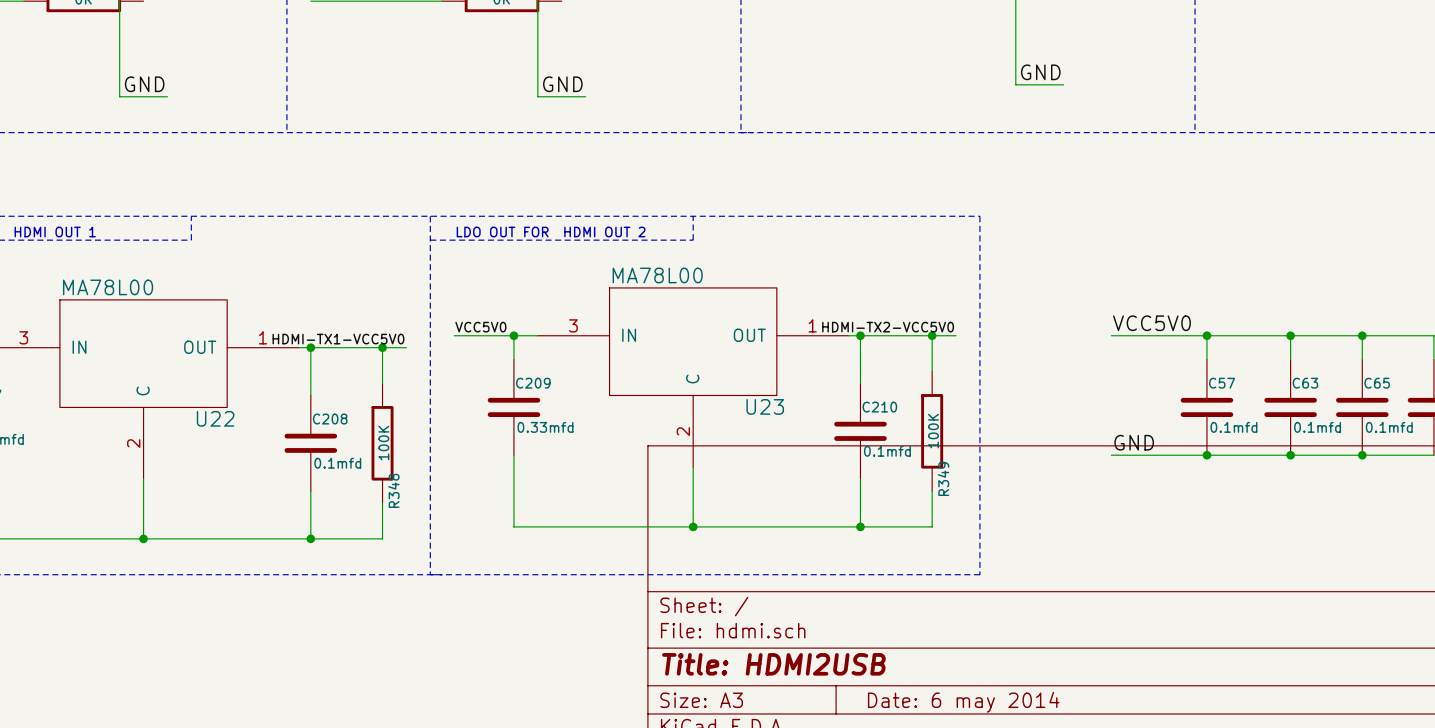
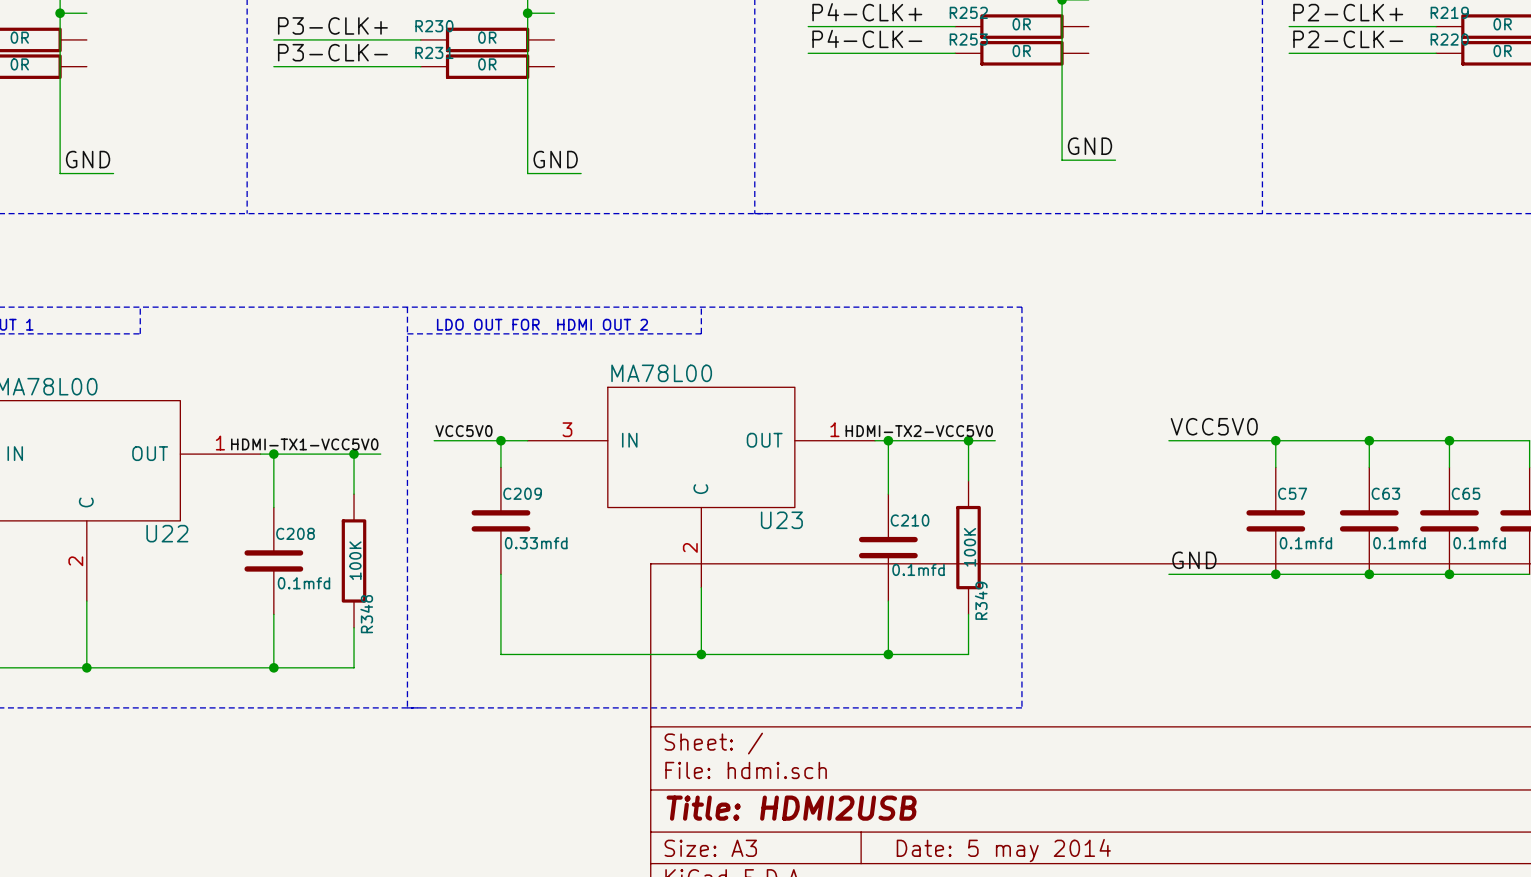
title block: Date: 6 may 2014 (963, 702) -> Date: 5 may 2014 (1003, 850)

